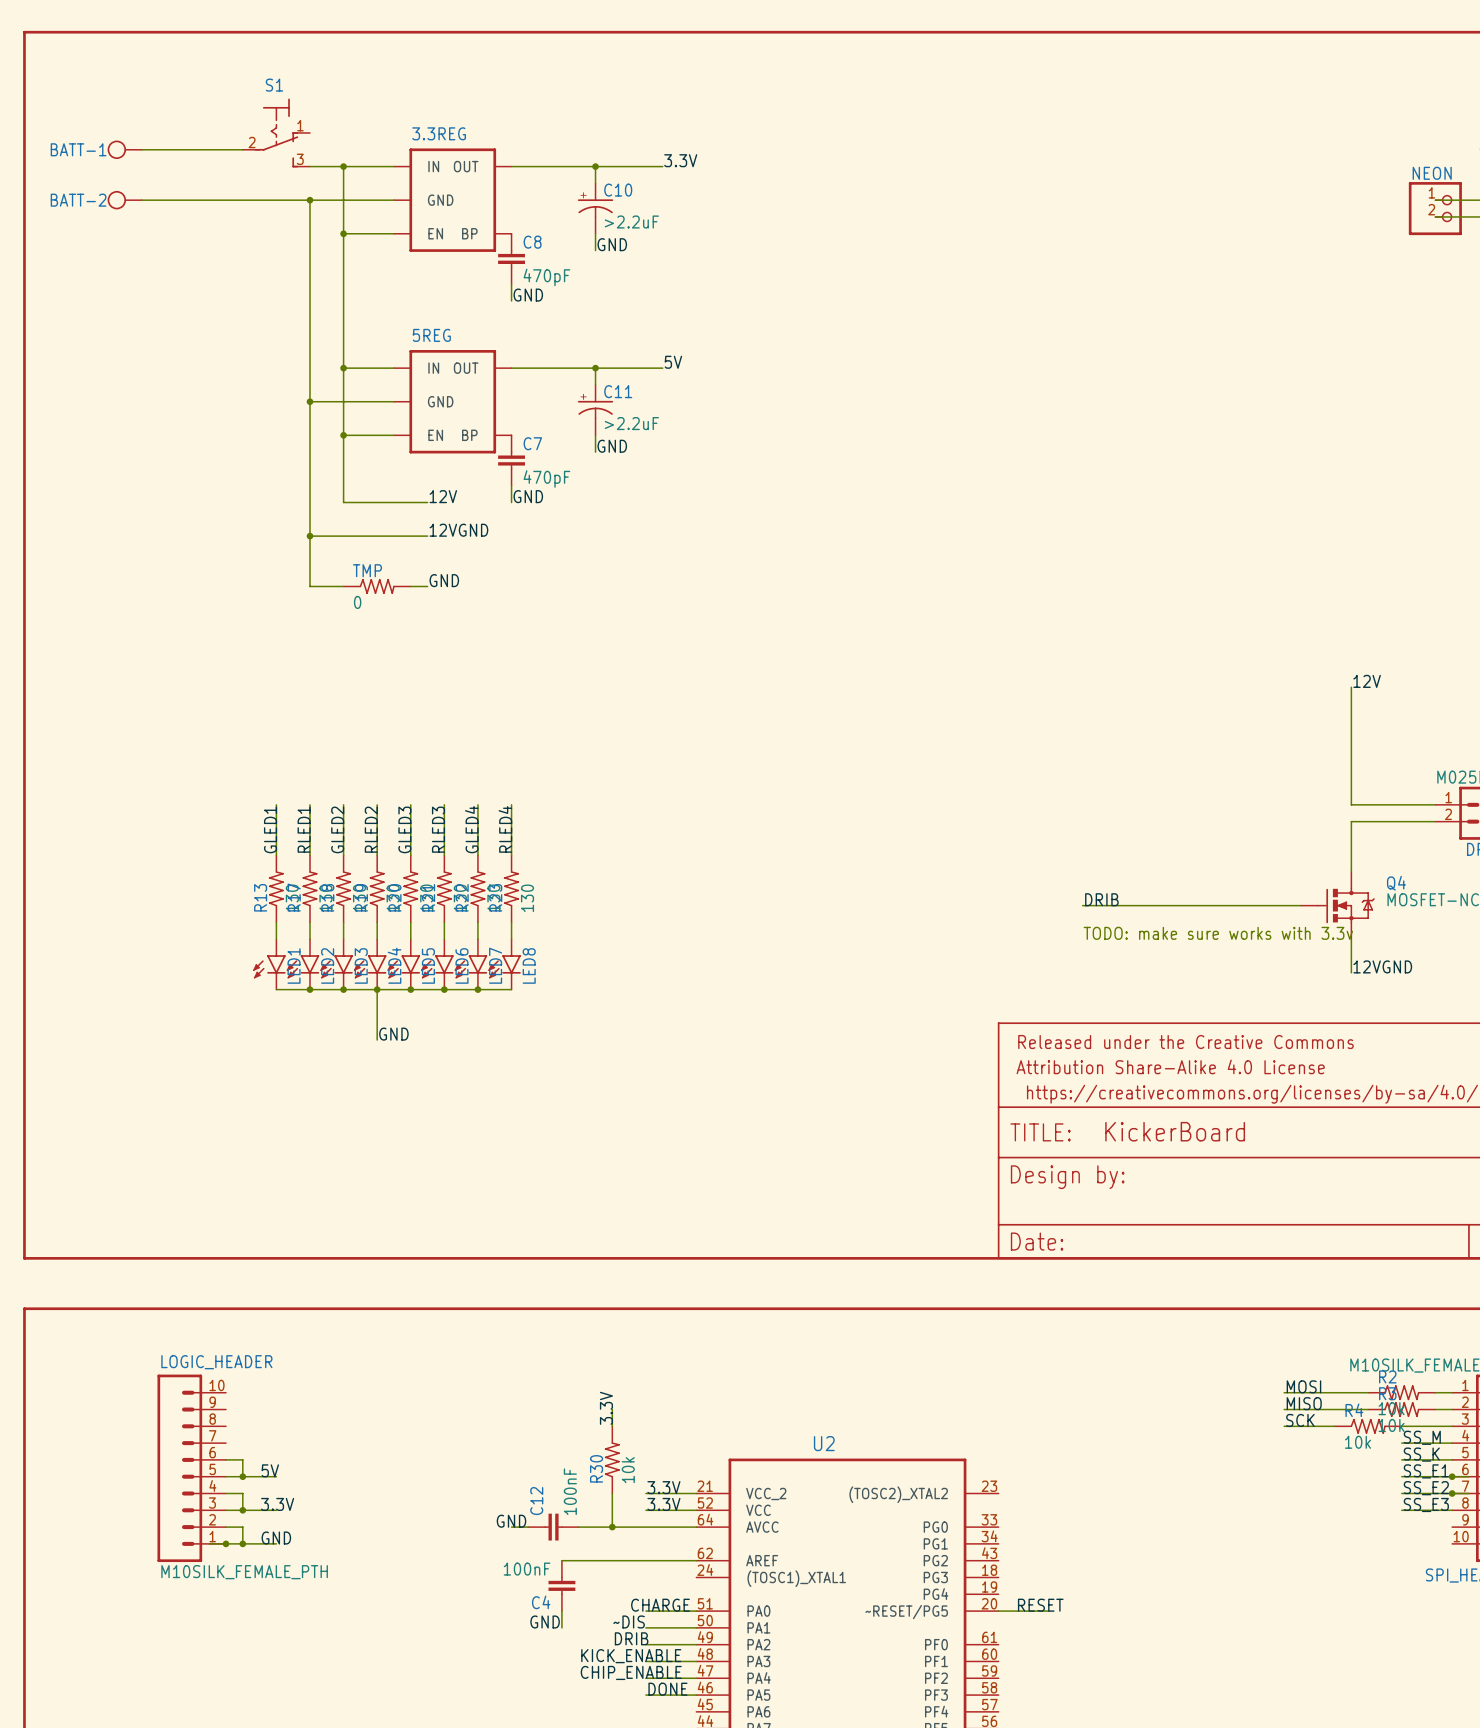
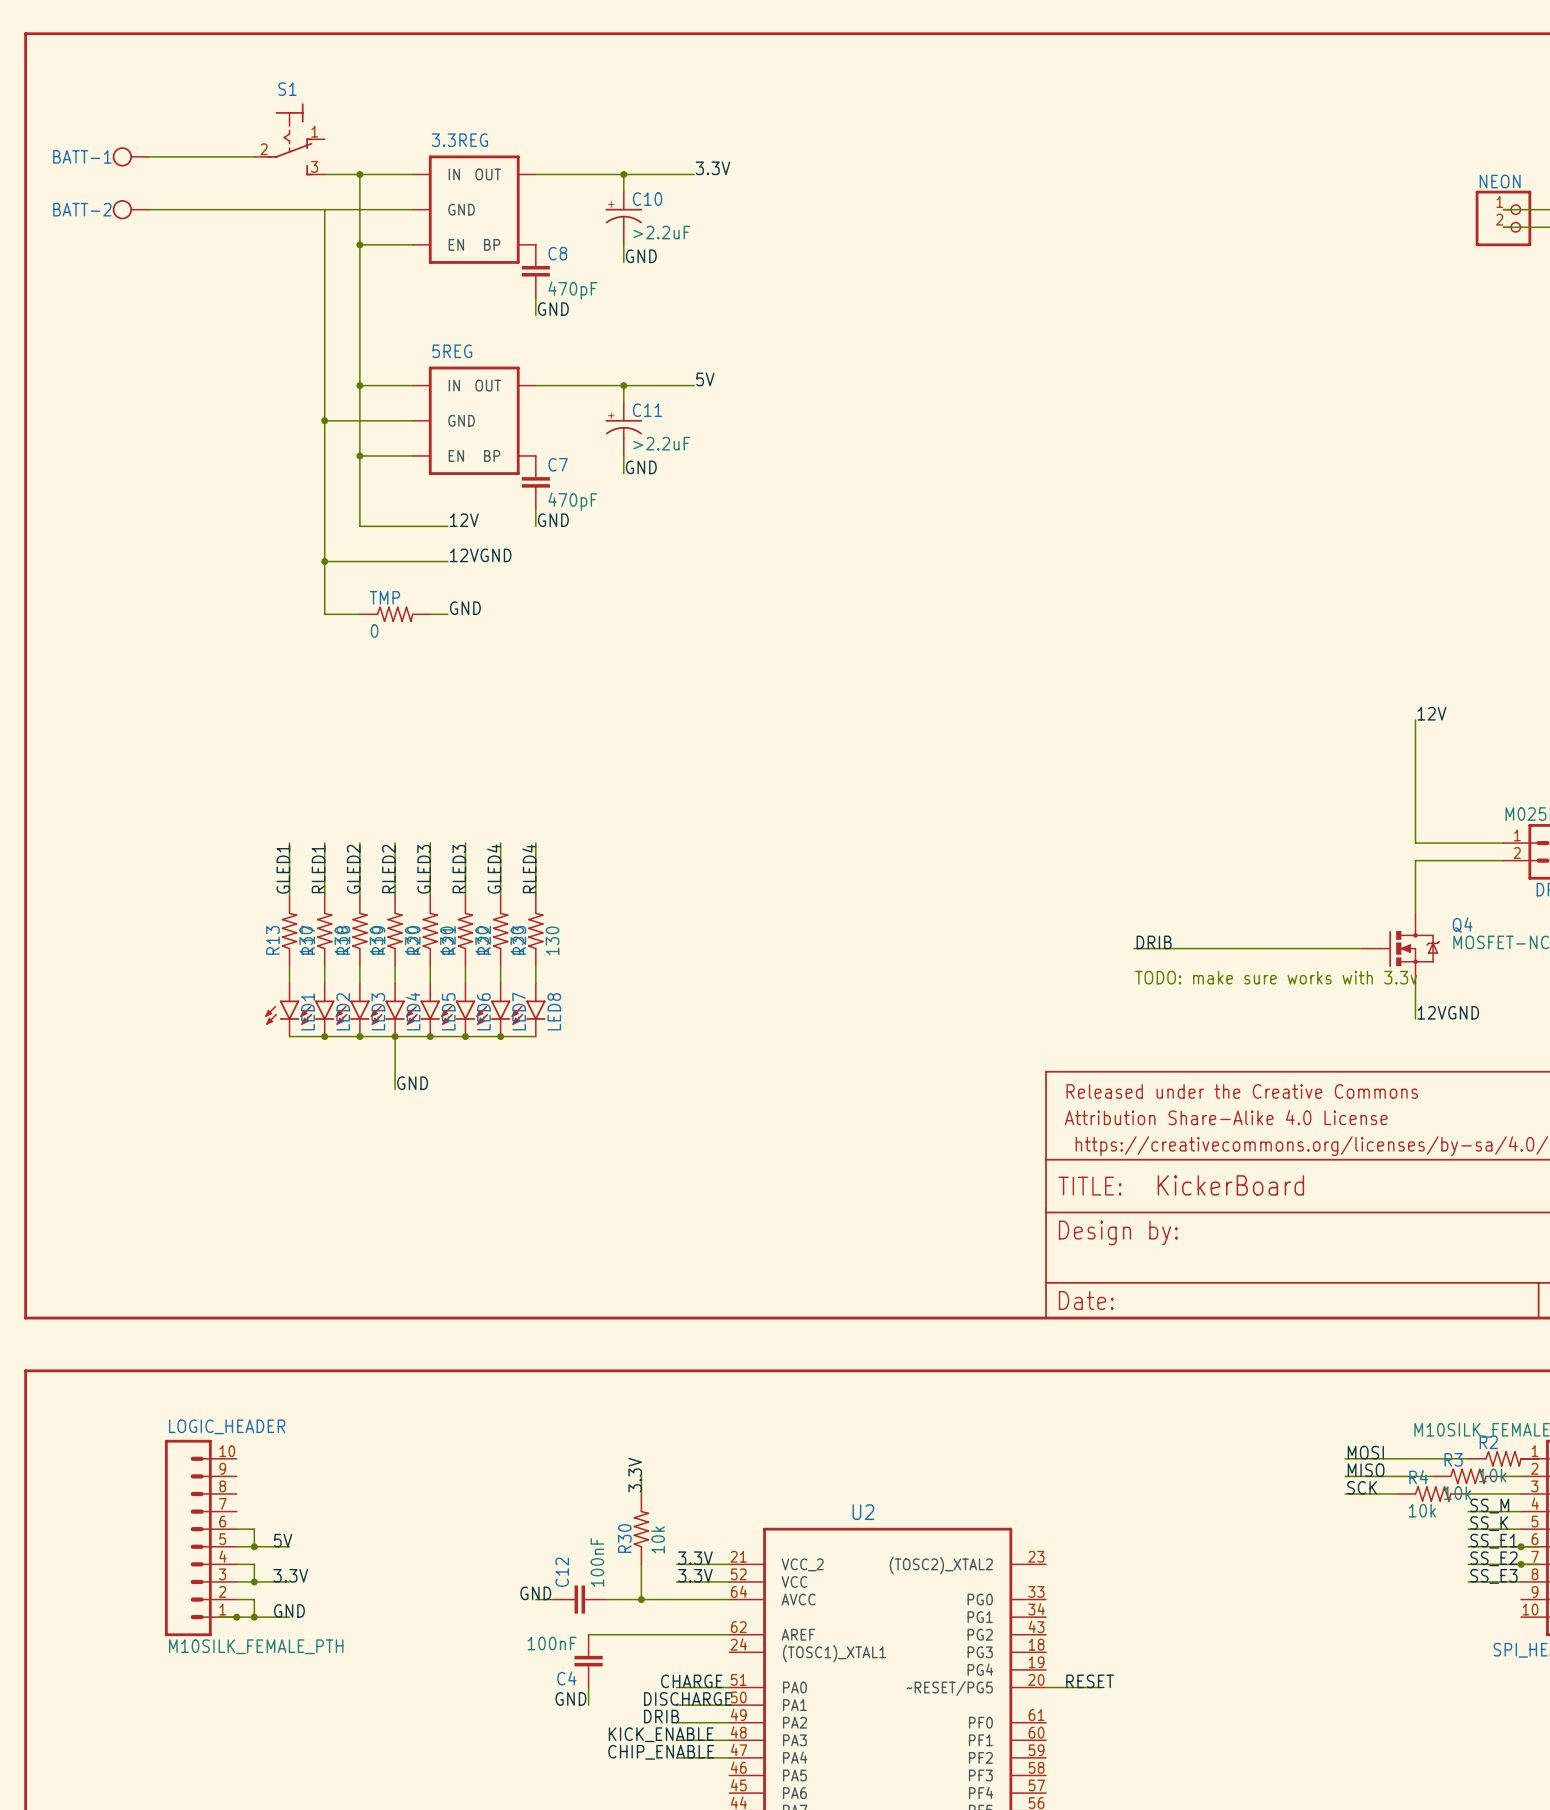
junction: (309, 200) -> none
R2 position: (1401, 1392) -> (1503, 1458)
wire: (1435, 1392) (1452, 1392) -> none
label: ~DIS (629, 1622) -> DISCHARGE (687, 1698)
label: DONE (667, 1689) -> none
wire: (645, 1695) (696, 1695) -> none

